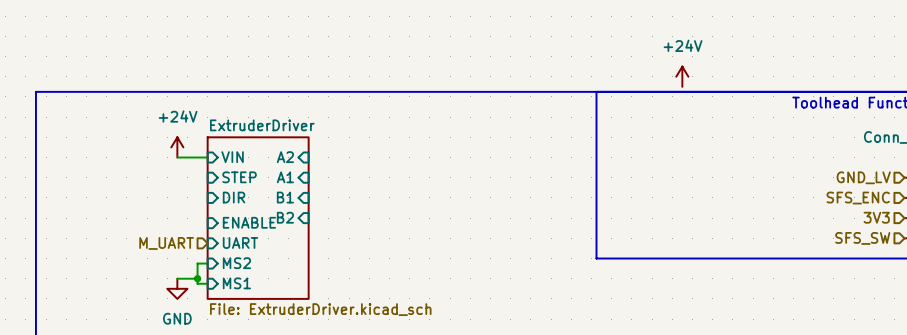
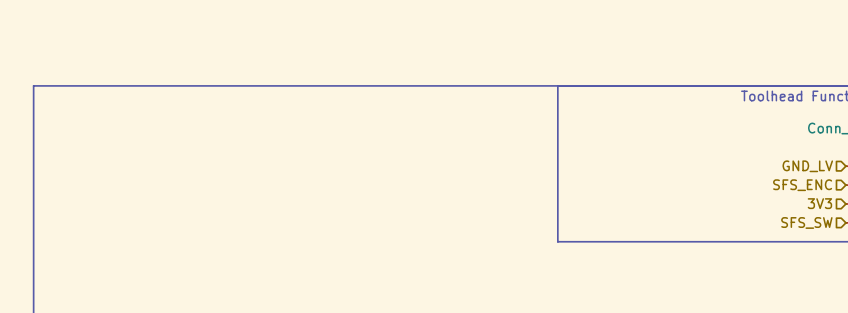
power symbol: +24V (682, 76) -> none
power symbol: +24V (177, 147) -> none
wire: (177, 157) (207, 157) -> none
sheet pin: VIN (232, 157) -> none
sheet pin: A2 (285, 157) -> none
sheet pin: STEP (239, 177) -> none
sheet pin: A1 (285, 177) -> none
sheet pin: DIR (234, 197) -> none
sheet pin: B1 (285, 197) -> none
sheet pin: B2 (285, 217) -> none
sheet ExtruderDriver: File: ExtruderDriver.kicad_sch (258, 218) -> none
sheet pin: ENABLE (249, 222) -> none
sheet pin: UART (240, 242) -> none
hierarchical label: M_UART (166, 243) -> none
wire: (207, 263) (197, 263) (197, 283) (207, 283) -> none
sheet pin: MS2 (236, 263) -> none
wire: (177, 278) (197, 278) -> none
junction: (197, 278) -> none
sheet pin: MS1 (236, 283) -> none
power symbol: GND (177, 288) -> none

